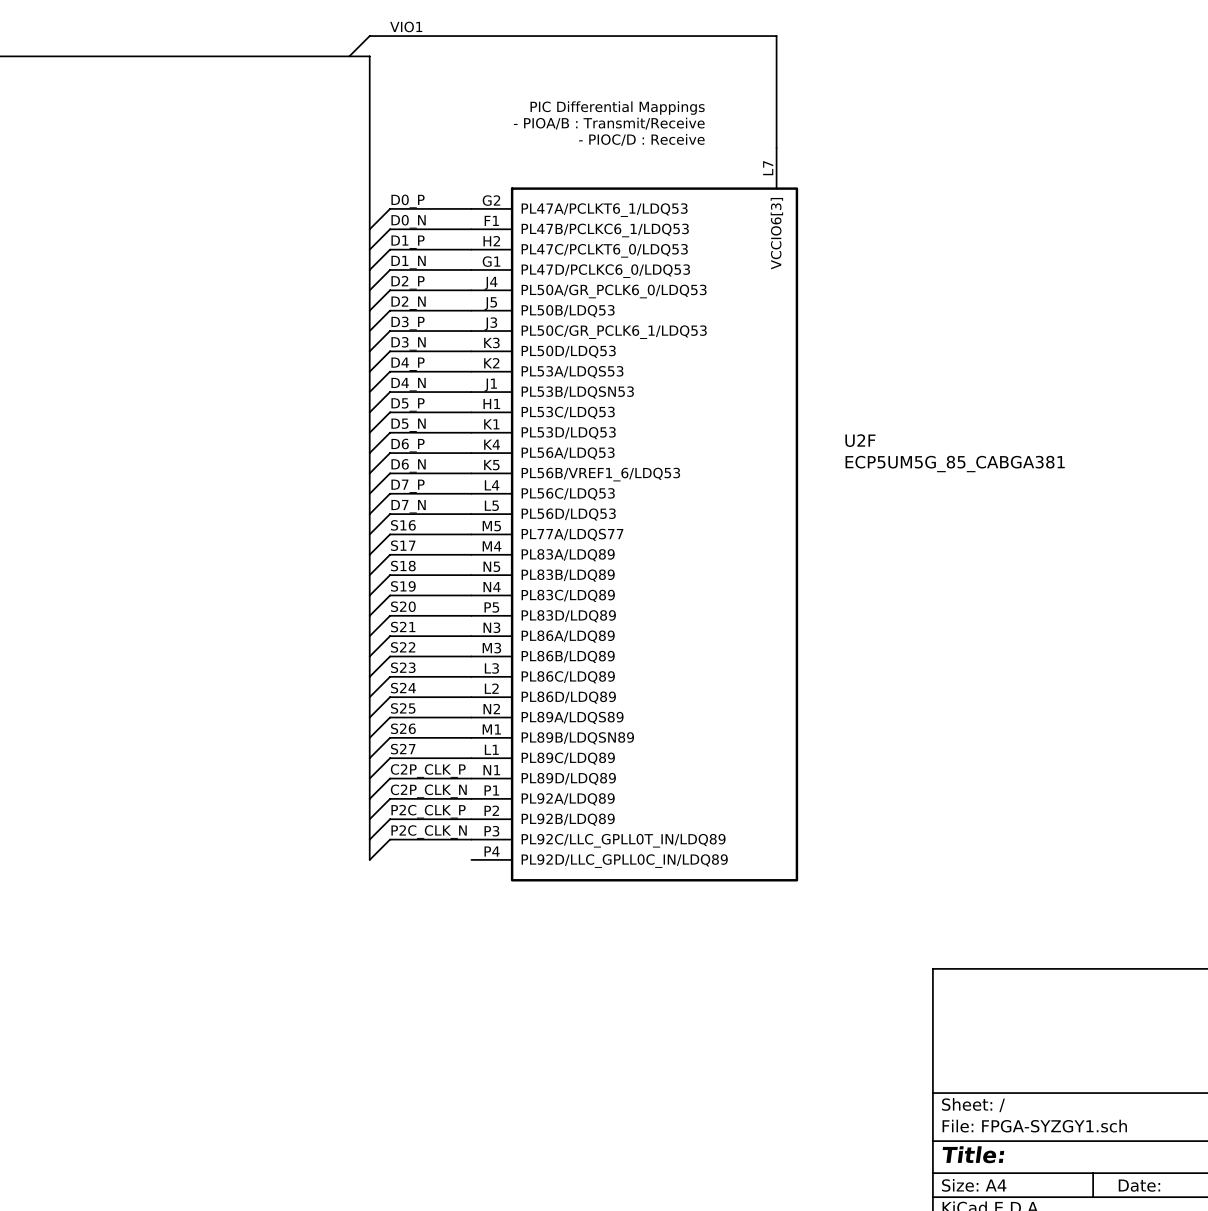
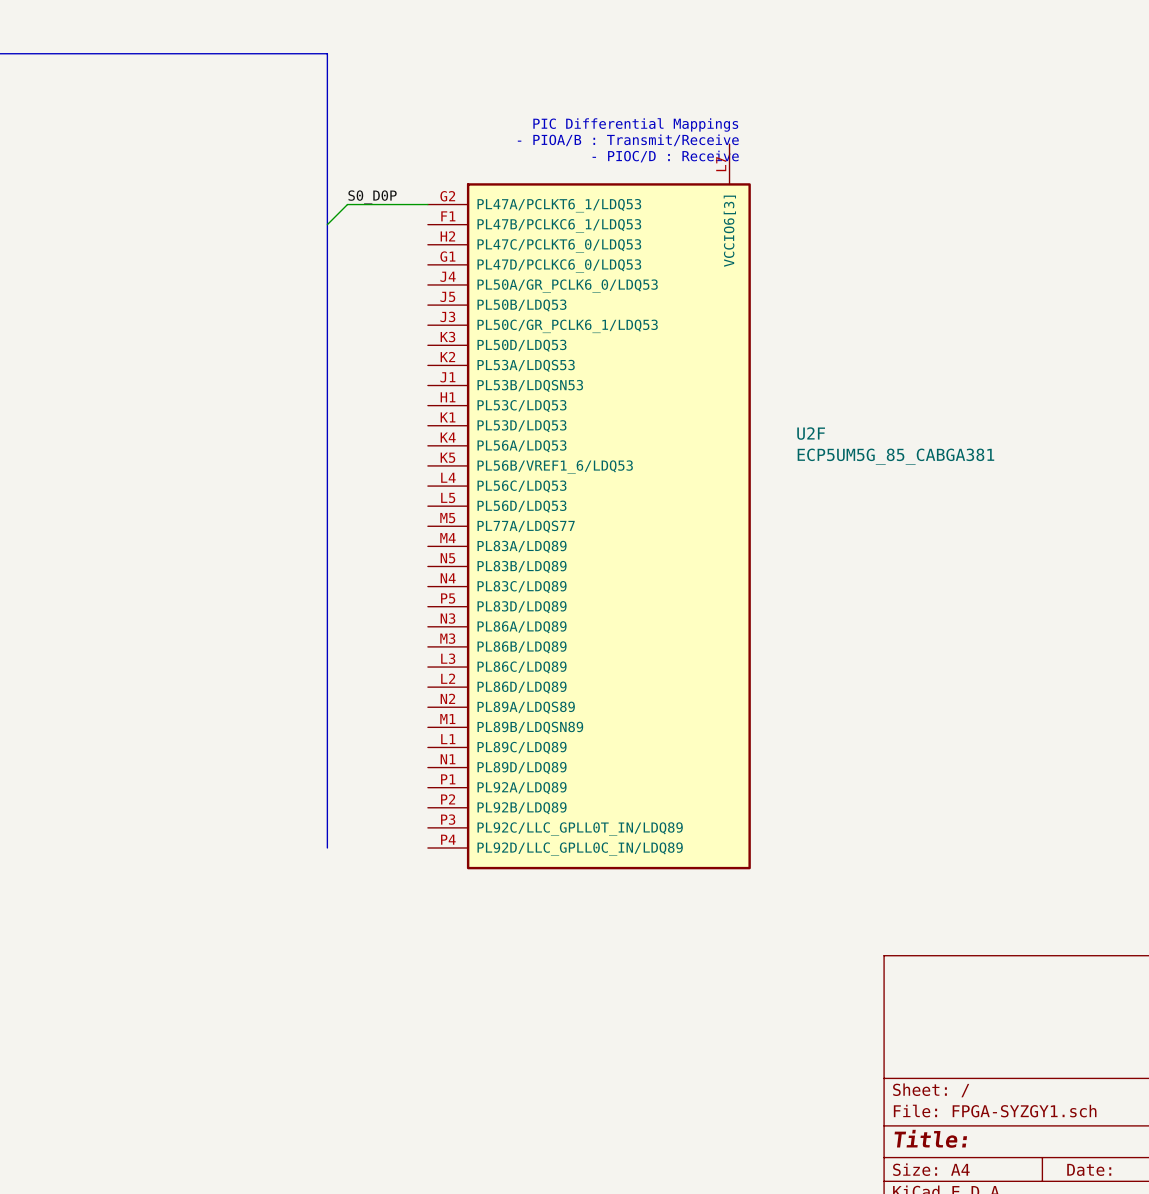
label: VIO1 (406, 26) -> none
wire: (349, 56) (369, 36) (776, 36) (776, 147) -> none
text position: PIC Differential Mappings (617, 108) -> PIC Differential Mappings (635, 124)
text position: - PIOA/B : Transmit/Receive (609, 123) -> - PIOA/B : Transmit/Receive (628, 140)
text position: - PIOC/D : Receive (641, 140) -> - PIOC/D : Receive (665, 156)
label: D0_P (408, 201) -> S0_D0P (372, 197)
label: D0_N (408, 221) -> none
wire: (471, 229) (390, 229) (369, 249) -> none
label: D1_P (408, 242) -> none
wire: (471, 249) (390, 249) (369, 269) -> none
label: D1_N (408, 262) -> none
wire: (471, 269) (390, 269) (369, 290) -> none
label: D2_P (408, 282) -> none
wire: (471, 290) (390, 290) (369, 310) -> none
label: D2_N (408, 303) -> none
wire: (471, 310) (390, 310) (369, 331) -> none
label: D3_P (408, 323) -> none
wire: (471, 331) (390, 331) (369, 351) -> none
label: D3_N (408, 343) -> none
wire: (471, 351) (390, 351) (369, 371) -> none
label: D4_P (408, 364) -> none
wire: (471, 371) (390, 371) (369, 392) -> none
label: D4_N (408, 384) -> none
wire: (471, 392) (390, 392) (369, 412) -> none
label: D5_P (408, 404) -> none
wire: (471, 412) (390, 412) (369, 432) -> none
label: D5_N (408, 425) -> none
wire: (471, 432) (390, 432) (369, 453) -> none
label: D6_P (408, 445) -> none
wire: (471, 453) (390, 453) (369, 473) -> none
label: D6_N (408, 465) -> none
wire: (471, 473) (390, 473) (369, 493) -> none
label: D7_P (408, 486) -> none
wire: (471, 493) (390, 493) (369, 514) -> none
label: D7_N (408, 506) -> none
wire: (471, 514) (390, 514) (369, 534) -> none
label: S16 (403, 525) -> none
wire: (471, 534) (390, 534) (369, 554) -> none
label: S17 (403, 545) -> none
wire: (471, 554) (390, 554) (369, 575) -> none
label: S18 (403, 566) -> none
wire: (471, 575) (390, 575) (369, 595) -> none
label: S19 (403, 586) -> none
wire: (471, 595) (390, 595) (369, 615) -> none
label: S20 (403, 606) -> none
wire: (471, 615) (390, 615) (369, 636) -> none
label: S21 (403, 627) -> none
wire: (471, 636) (390, 636) (369, 656) -> none
label: S22 (403, 647) -> none
wire: (471, 656) (390, 656) (369, 676) -> none
label: S23 (403, 667) -> none
wire: (471, 676) (390, 676) (369, 697) -> none
label: S24 (403, 688) -> none
wire: (471, 697) (390, 697) (369, 717) -> none
label: S25 (403, 708) -> none
wire: (471, 717) (390, 717) (369, 737) -> none
label: S26 (403, 728) -> none
wire: (471, 737) (390, 737) (369, 758) -> none
label: S27 (403, 749) -> none
wire: (471, 758) (390, 758) (369, 778) -> none
label: C2P_CLK_P (428, 771) -> none
wire: (471, 778) (390, 778) (369, 798) -> none
label: C2P_CLK_N (428, 791) -> none
wire: (471, 798) (390, 798) (369, 819) -> none
label: P2C_CLK_P (428, 811) -> none
wire: (471, 819) (390, 819) (369, 839) -> none
label: P2C_CLK_N (429, 832) -> none
wire: (471, 839) (390, 839) (369, 859) -> none

